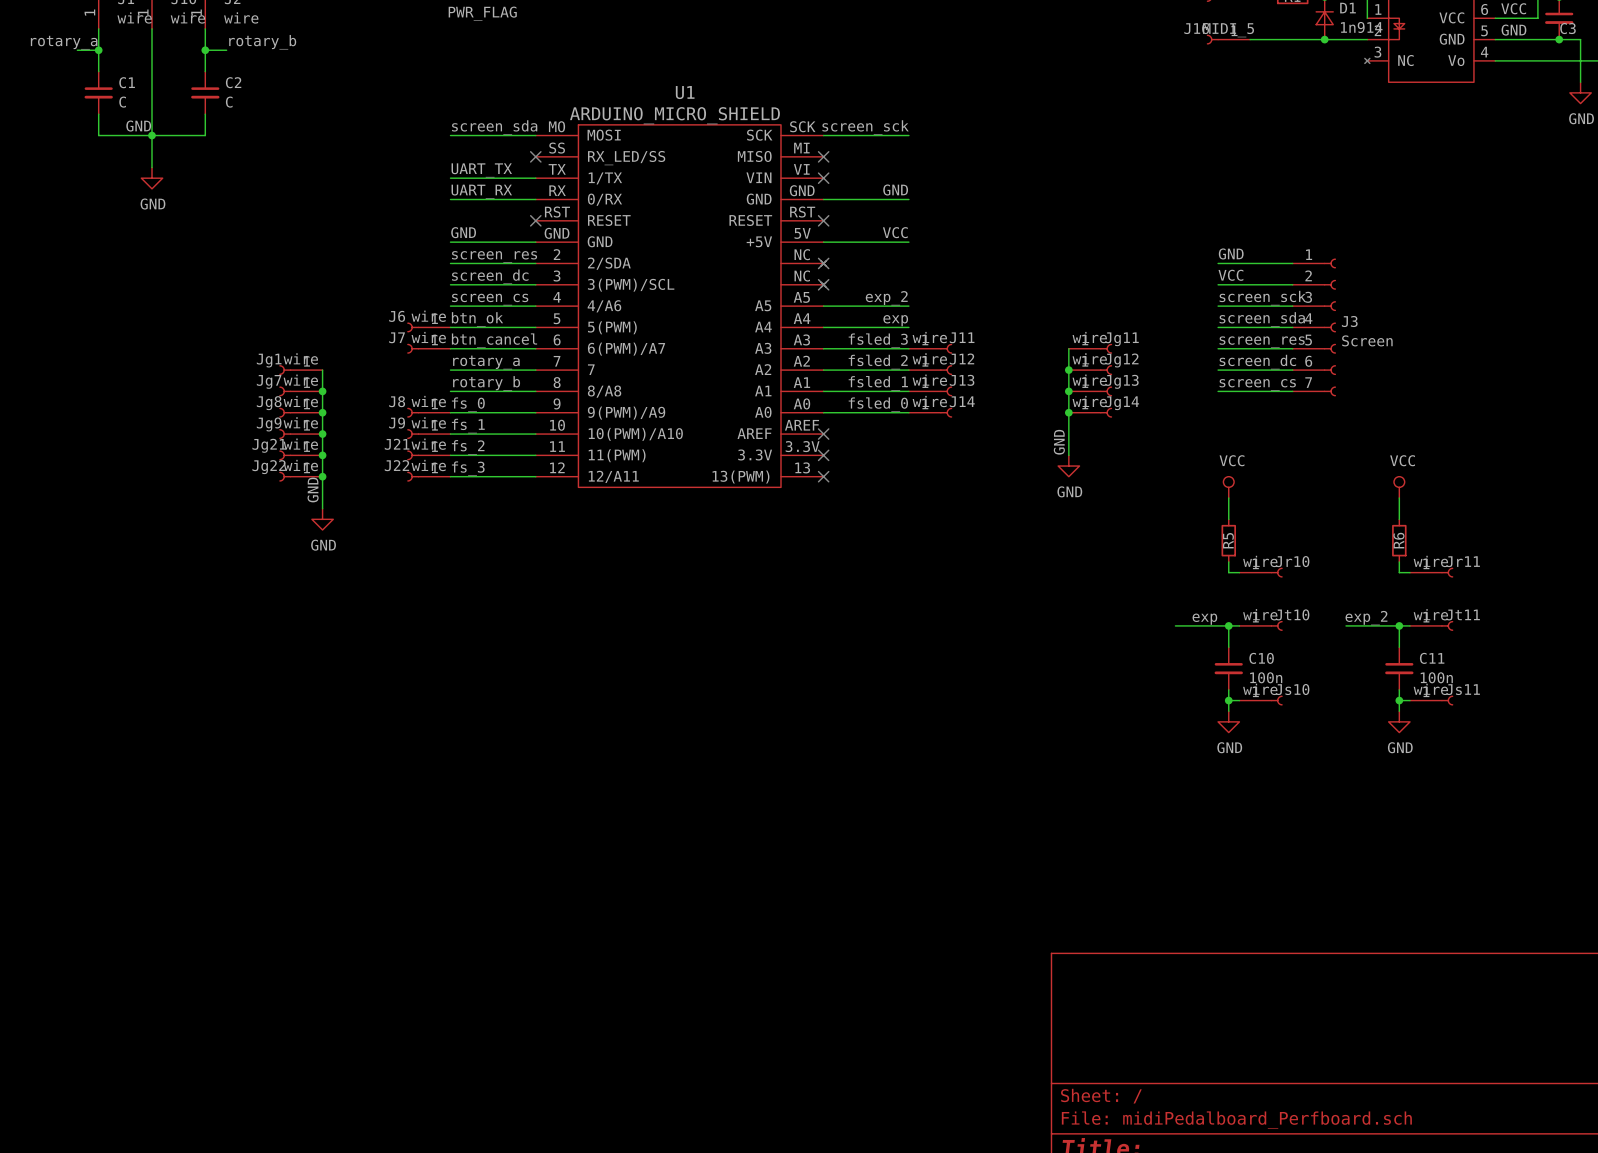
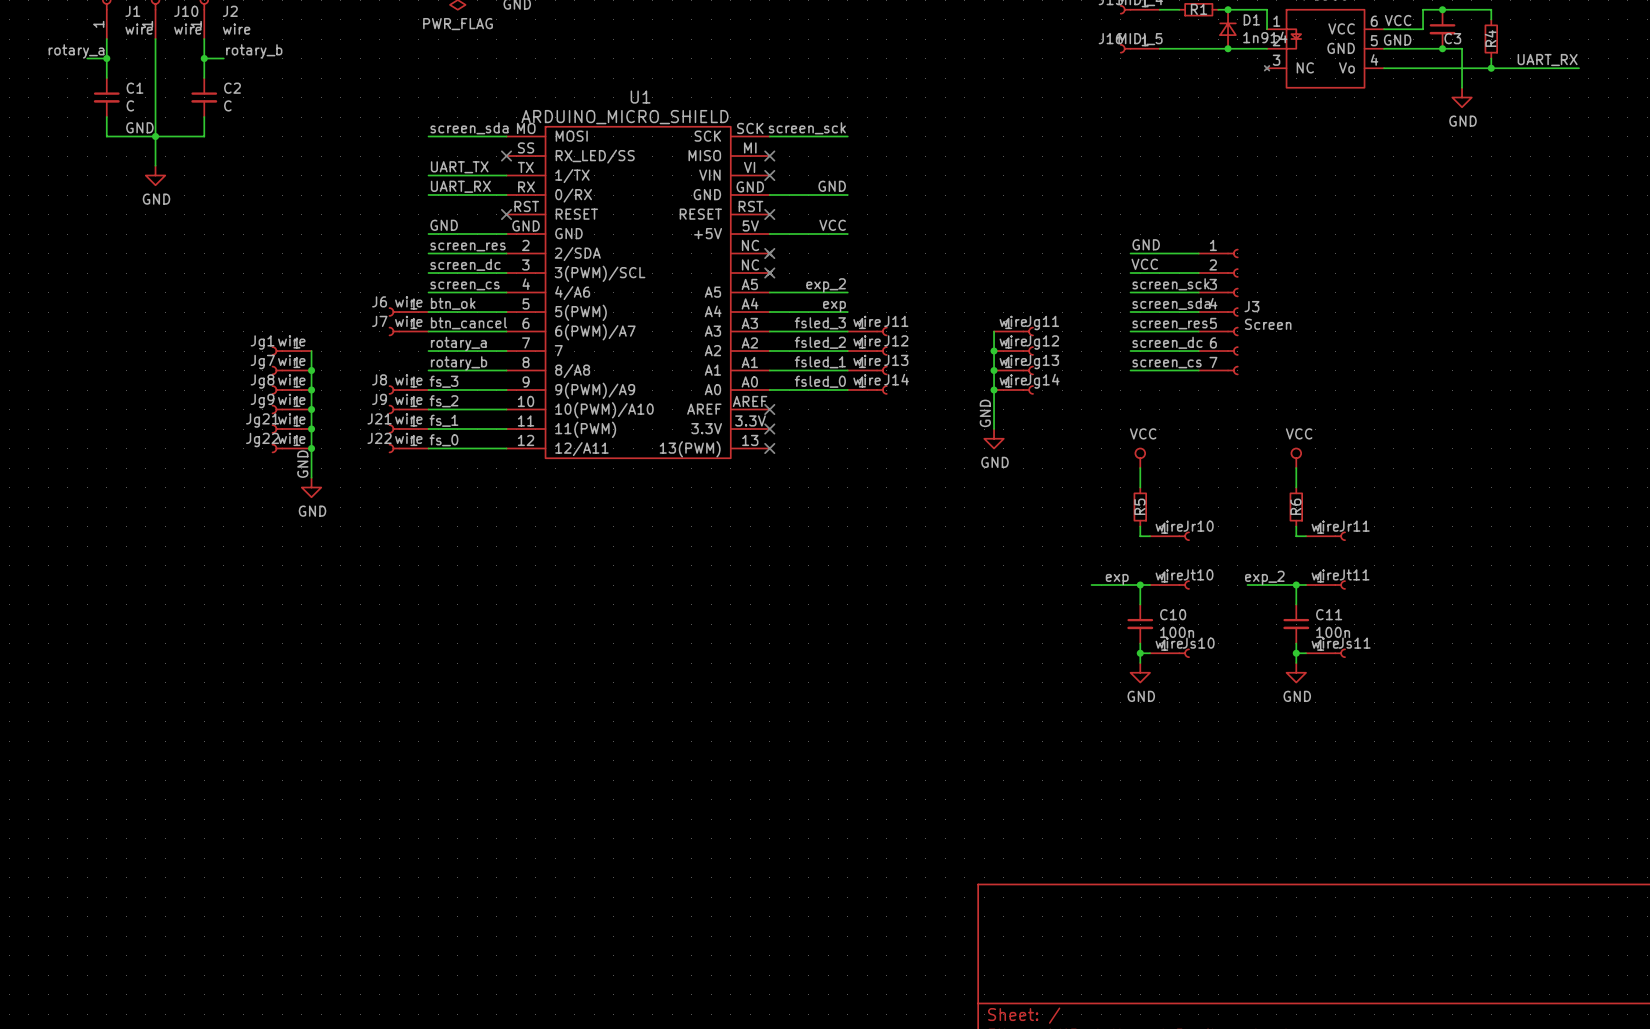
label: fs_0 (468, 404) -> fs_3 (443, 381)
label: fs_1 (468, 426) -> fs_2 (443, 401)
label: fs_2 (468, 447) -> fs_1 (443, 420)
label: fs_3 (468, 468) -> fs_0 (443, 440)

